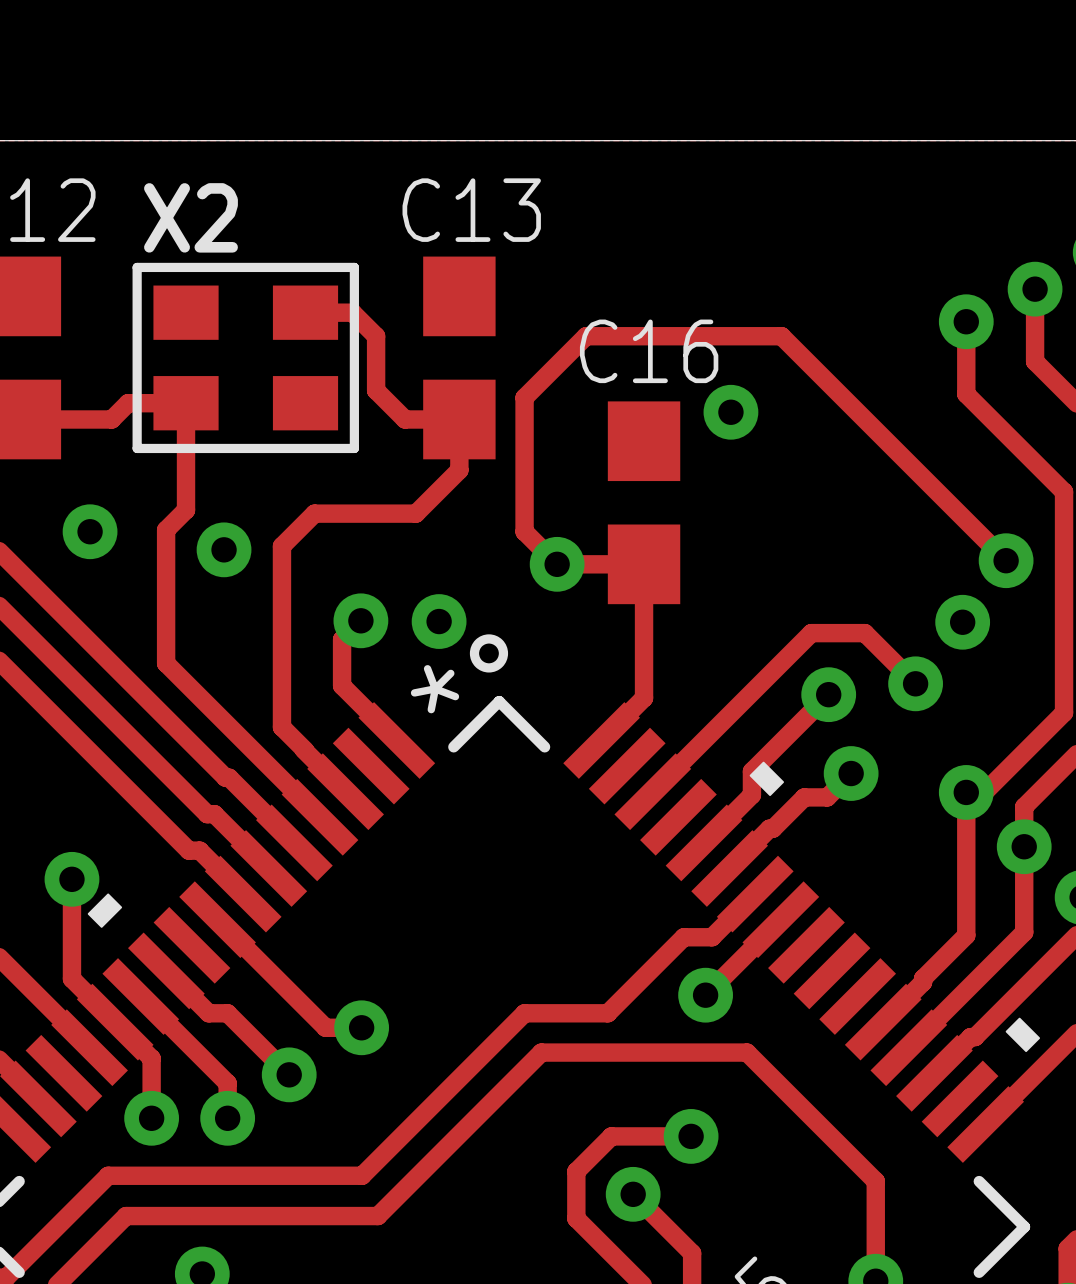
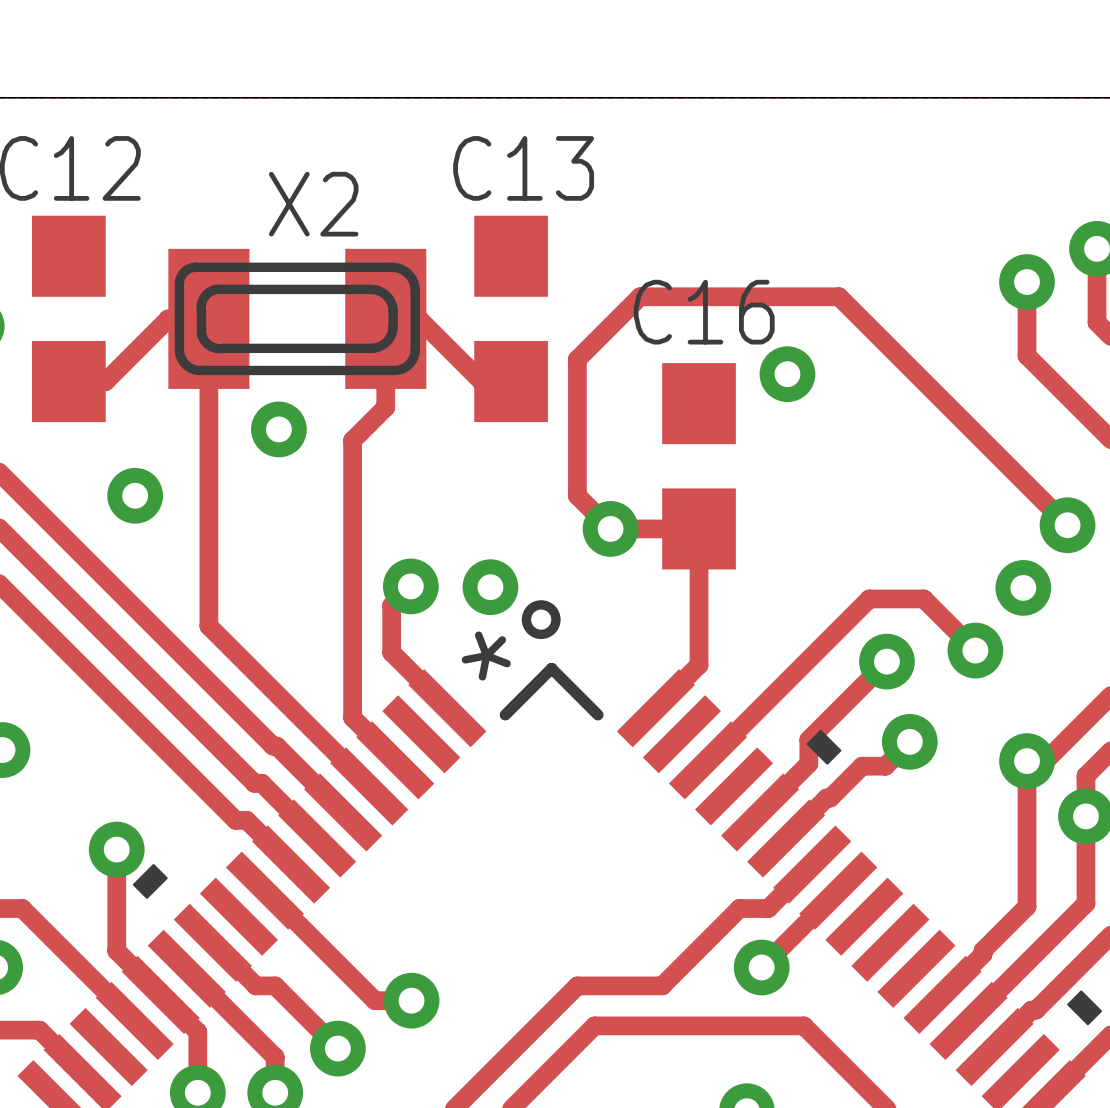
X2 name position: X2 (190, 217) -> X2 (313, 204)
X2 footprint: [132, 262, 359, 454] -> [168, 248, 427, 389]
track: (305, 312) (352, 312) (376, 336) (376, 390) (405, 419) (430, 419) -> none
track: (61, 419) (111, 419) (128, 403) (186, 403) (186, 510) (166, 530) (166, 663) -> (105, 381) (168, 318) (208, 318) (208, 626) (212, 629)
track: (459, 419) (459, 470) (415, 513) (314, 513) (281, 546) (281, 727) (305, 750) -> (481, 381) (418, 318) (385, 318) (385, 407) (352, 440) (352, 717)
via position: (224, 549) -> (278, 429)

